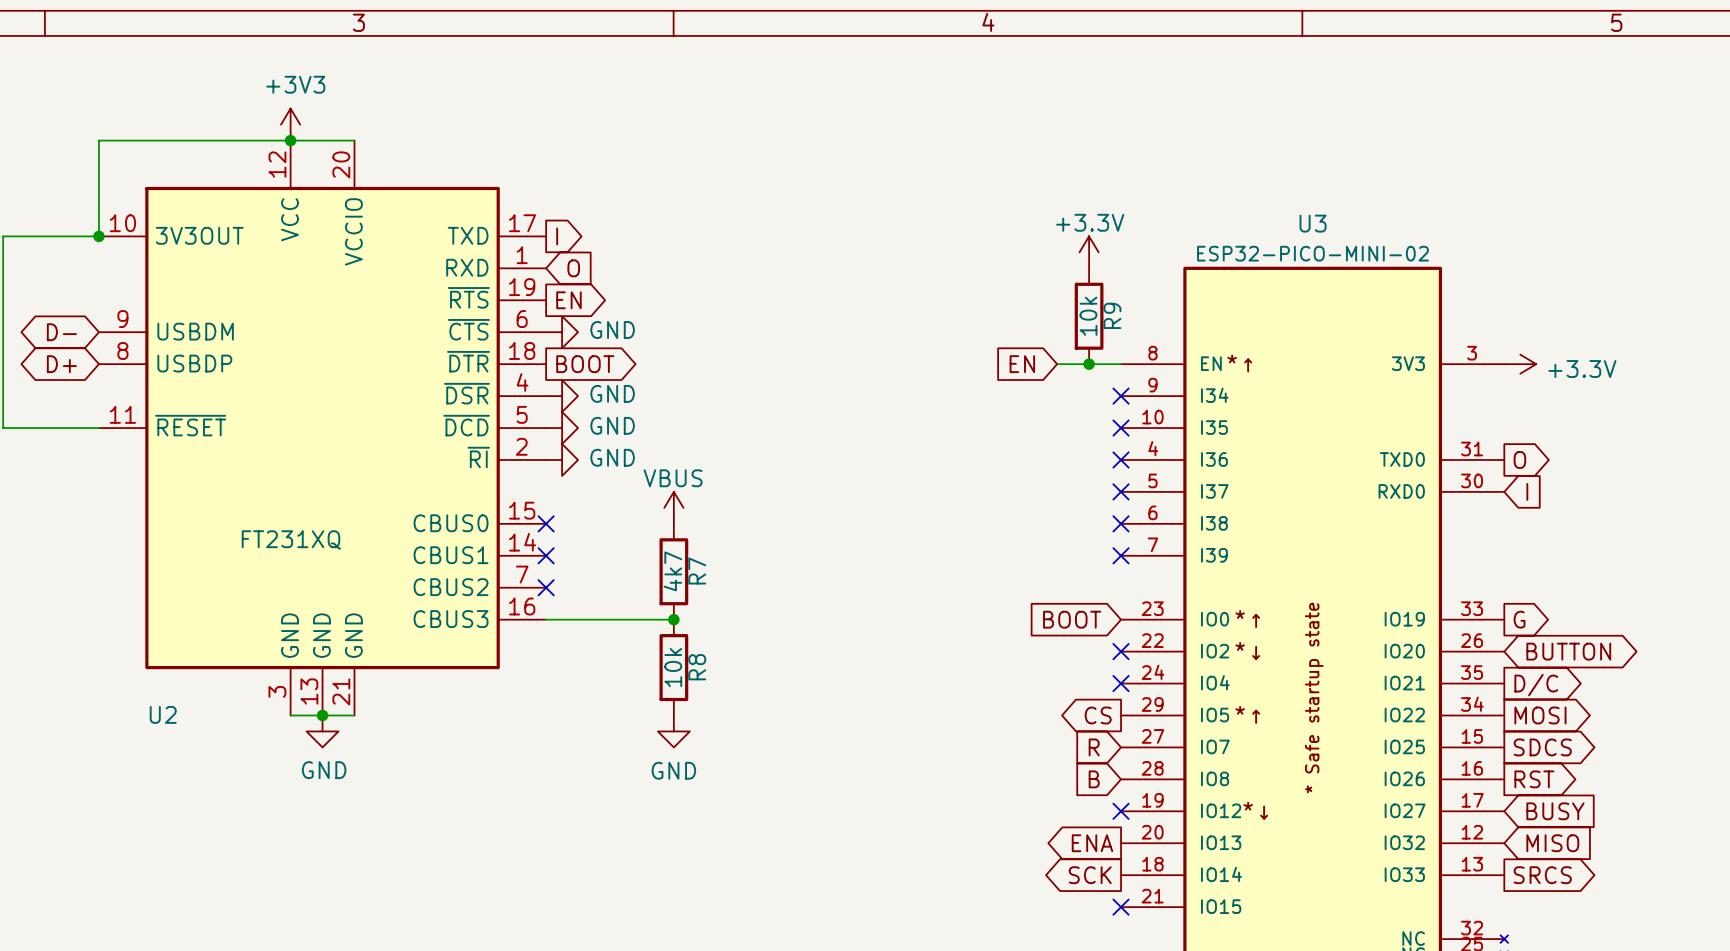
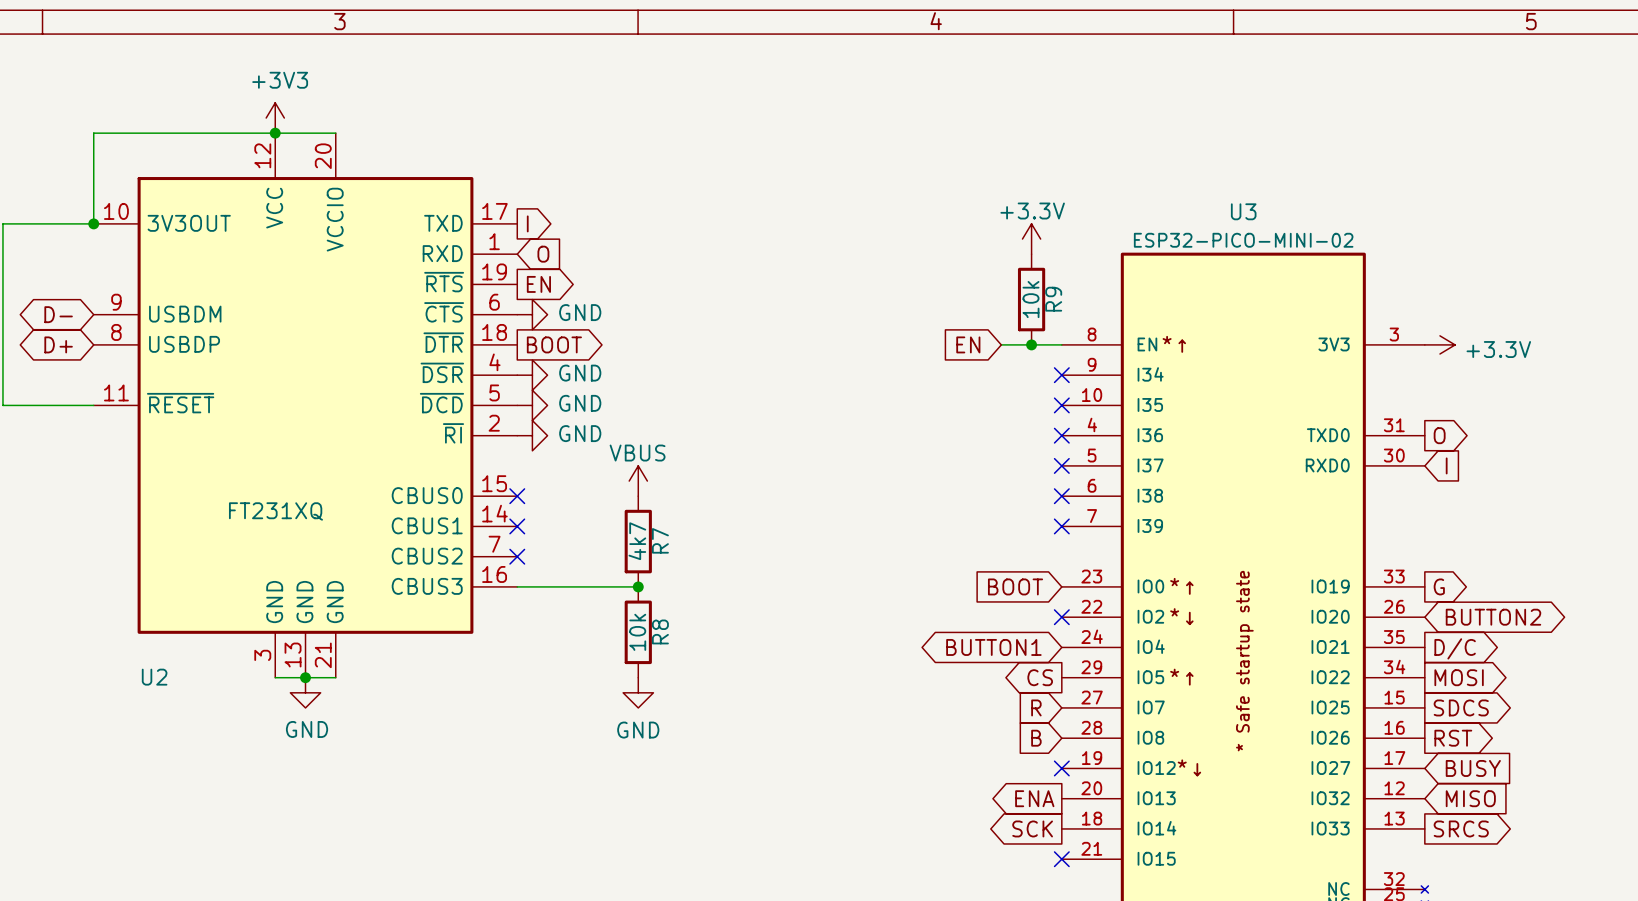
global label: BUTTON (1568, 651) -> BUTTON2 (1493, 617)
global label: none -> BUTTON1 (993, 647)
no-connect mark: (1121, 683) -> none

